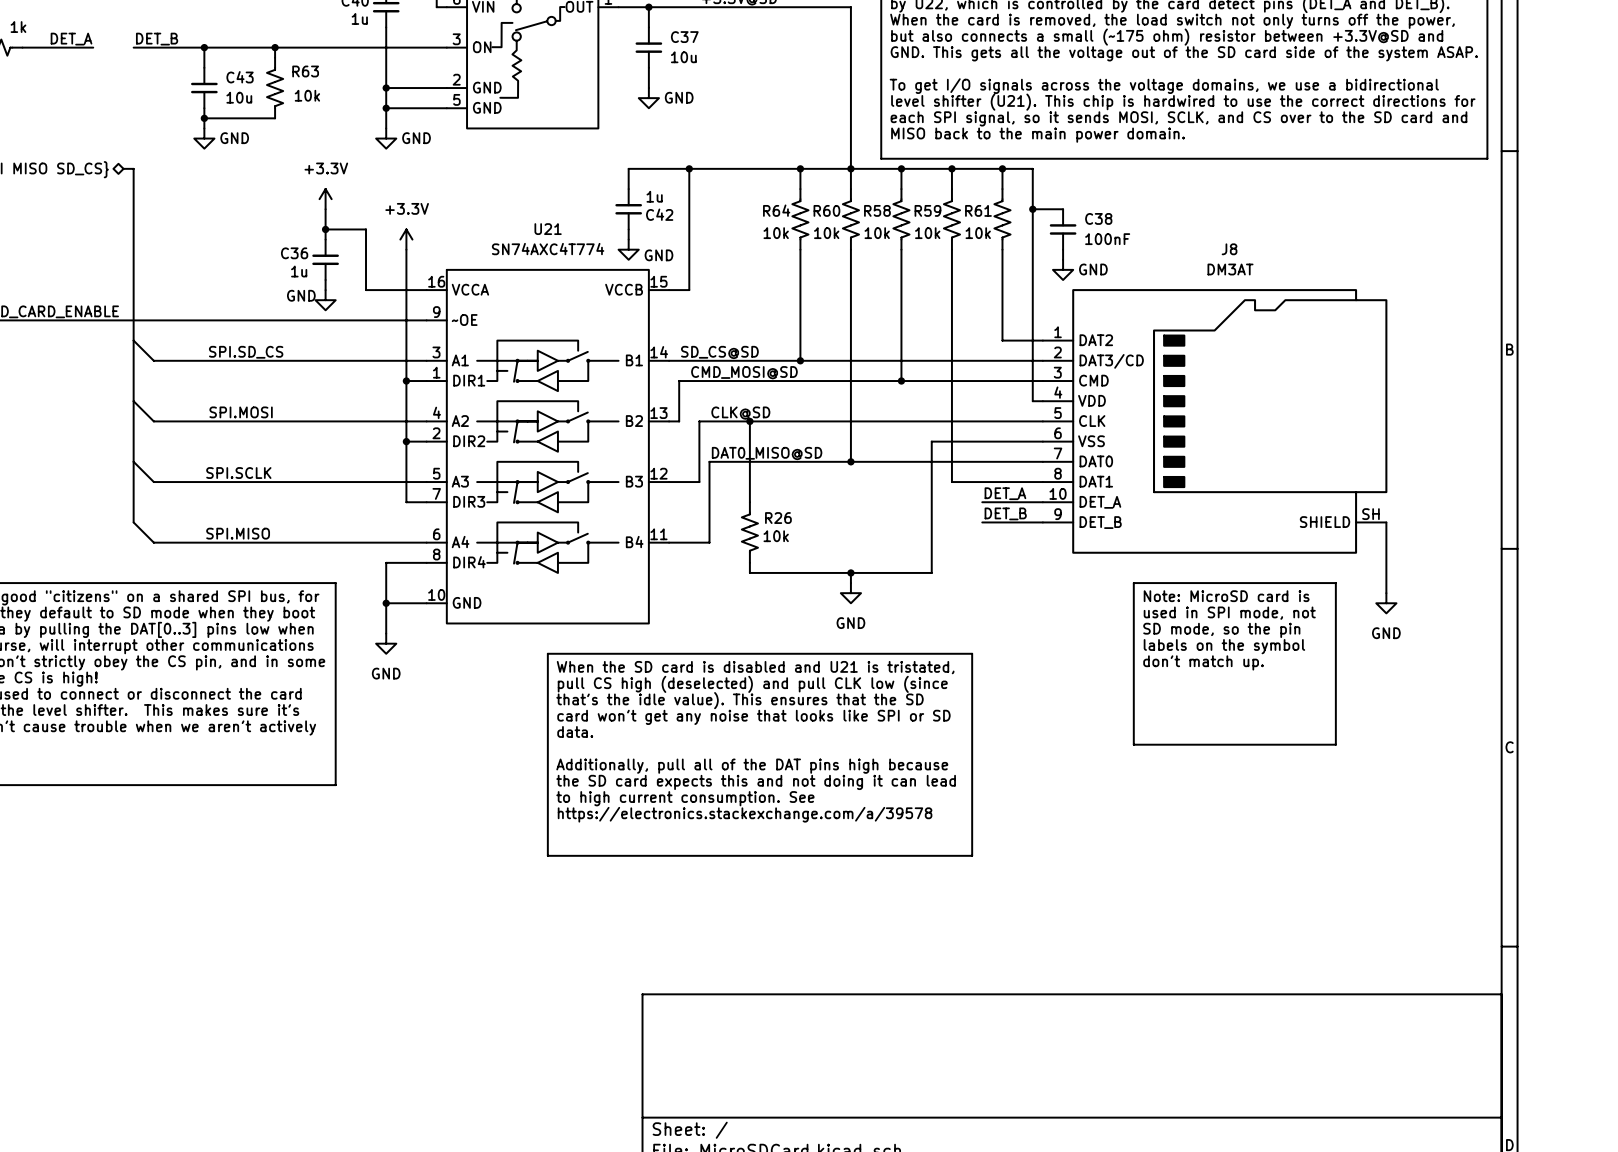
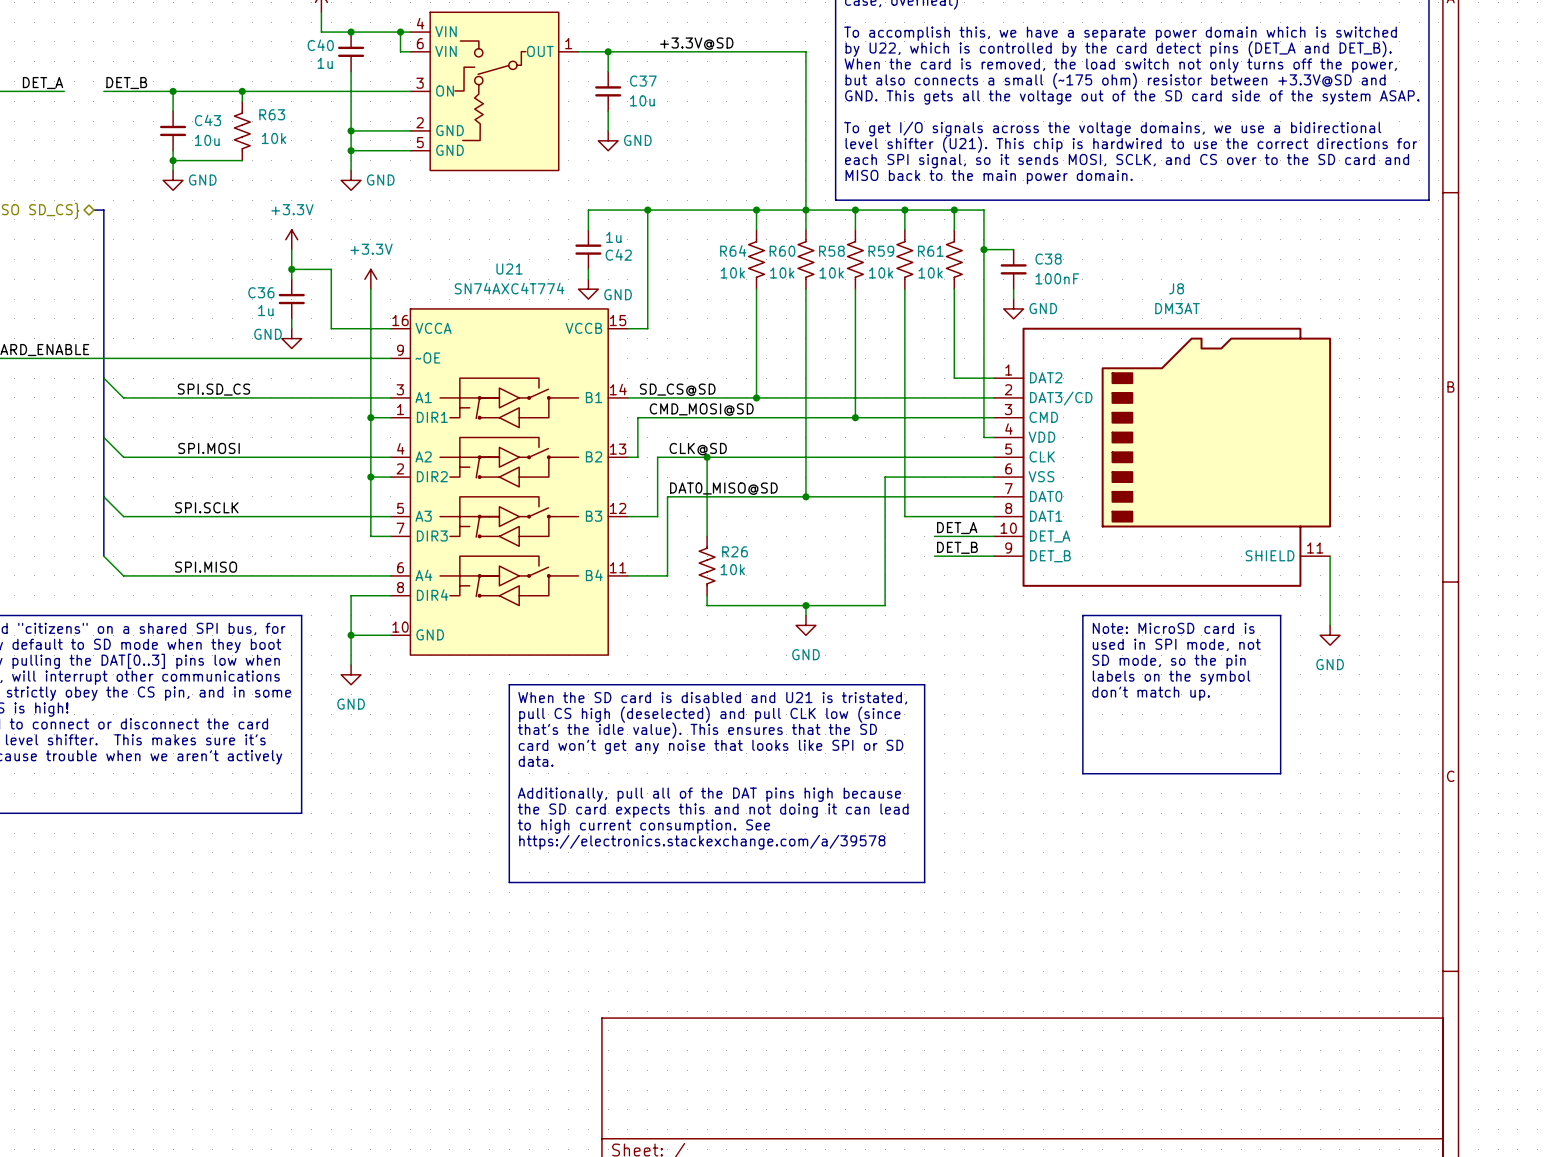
J8 pin number: SH (1370, 514) -> 11 (1315, 548)

